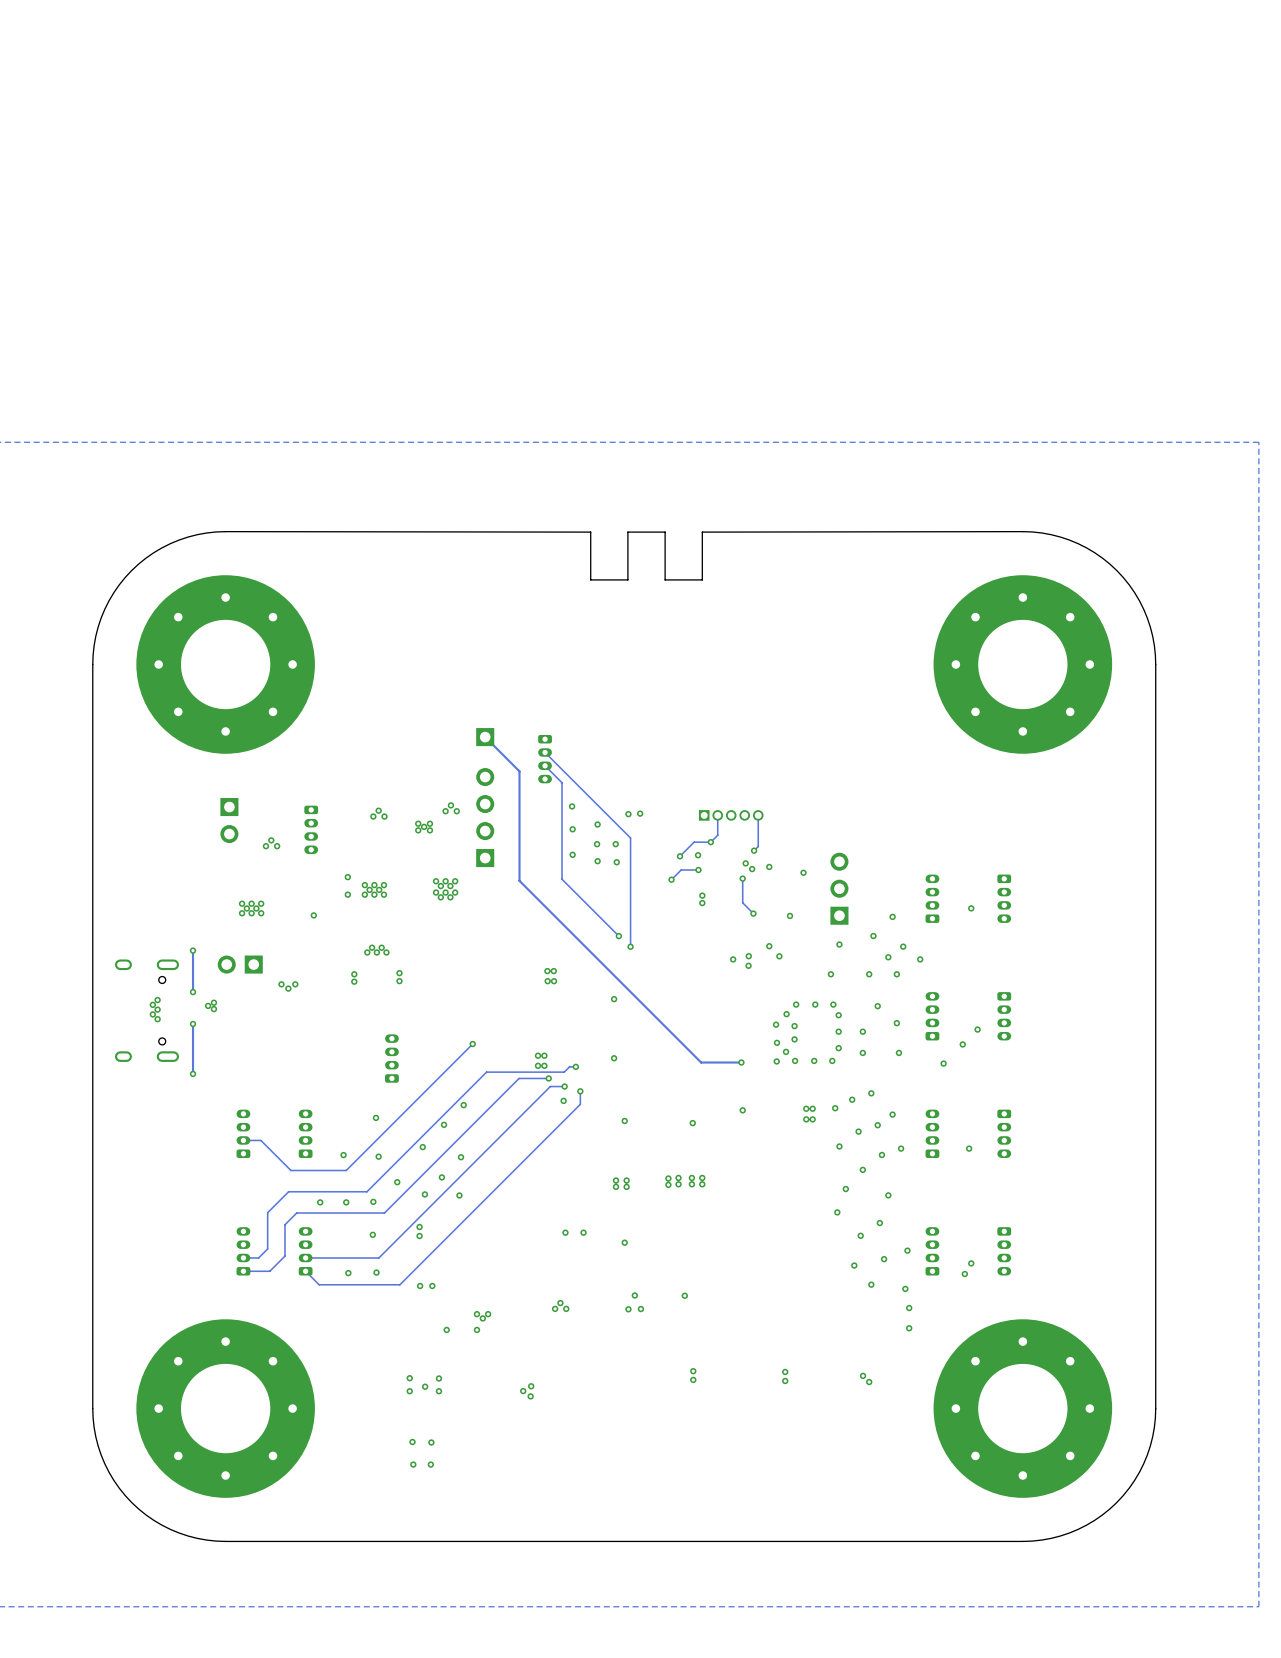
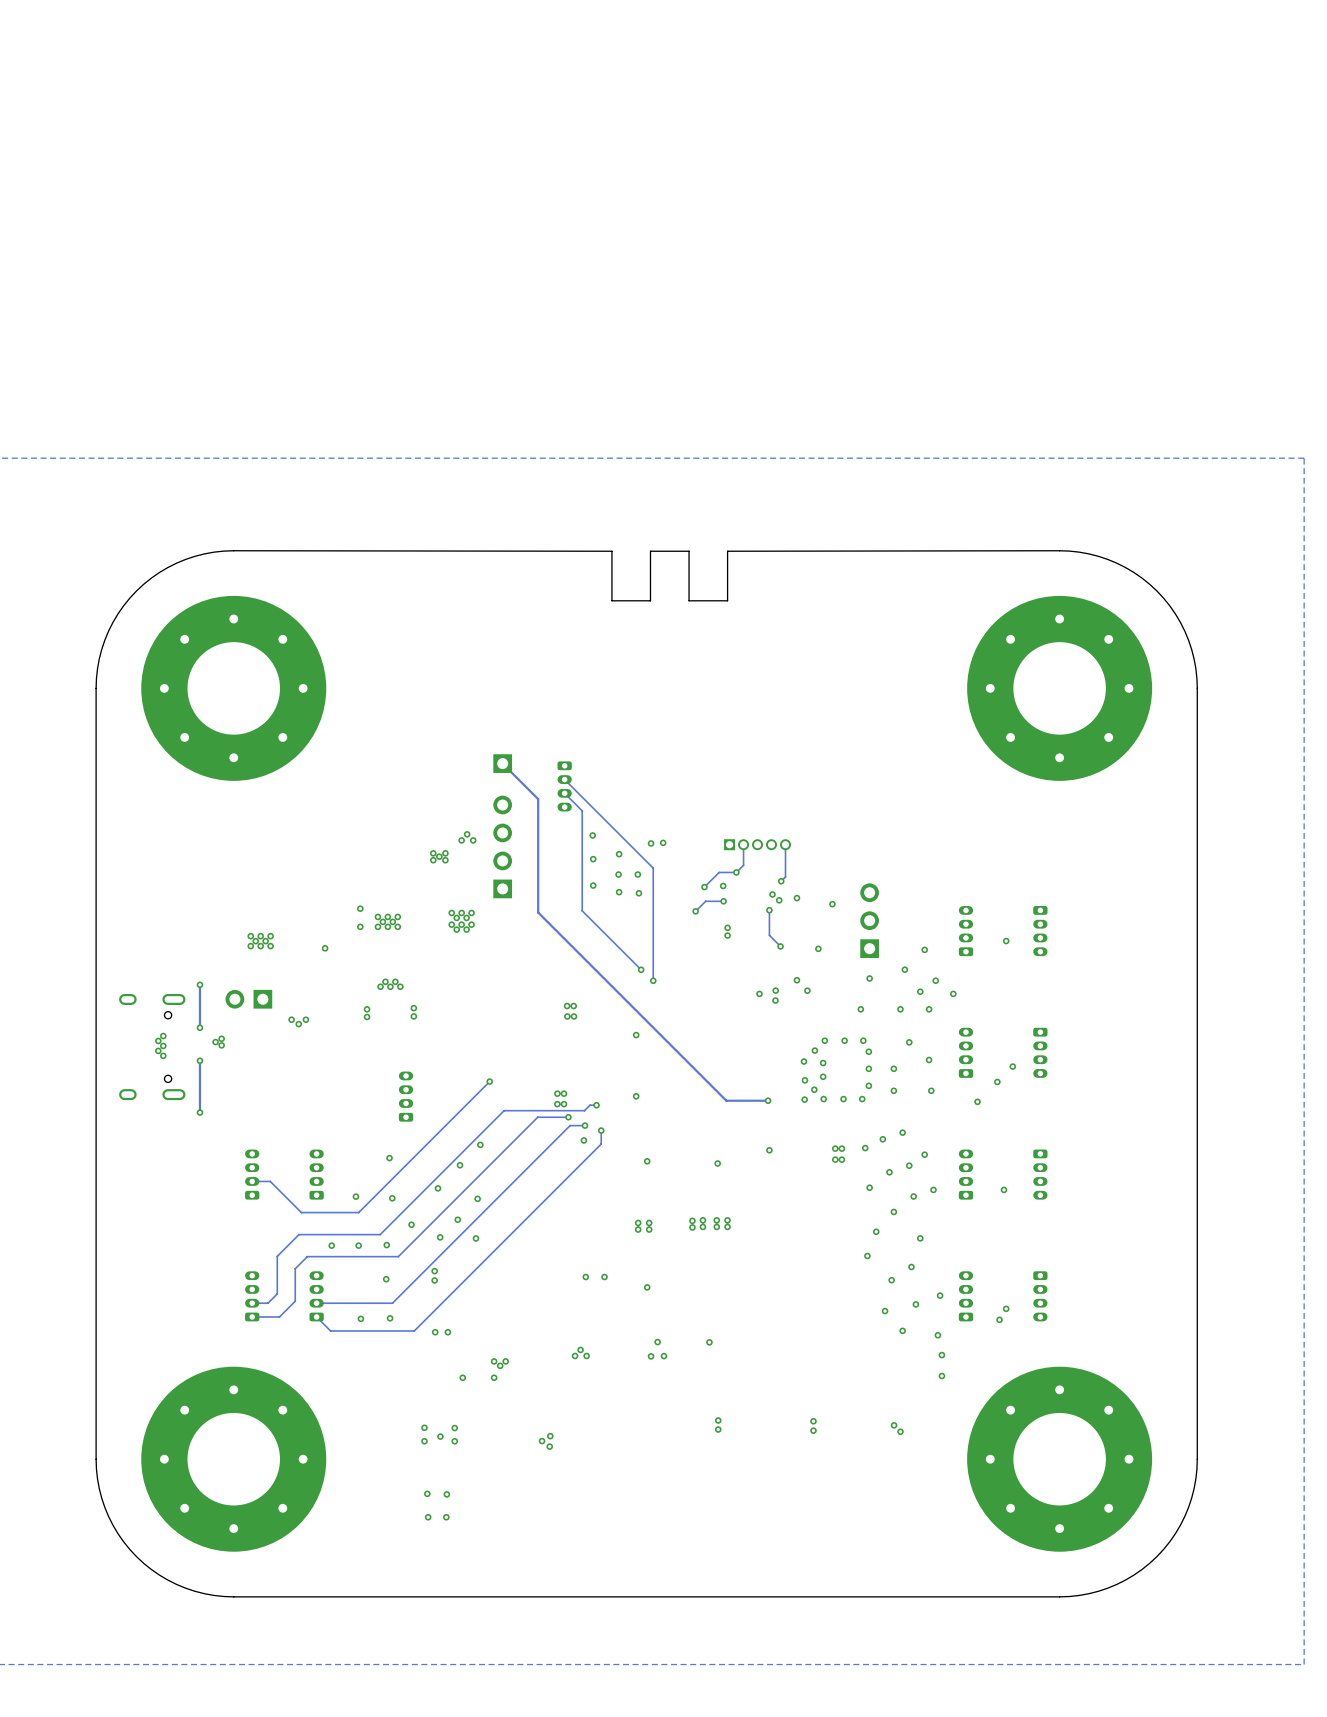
via: (378, 810) -> none
via: (373, 816) -> none
via: (384, 816) -> none
part: (229, 820) -> none
part: (311, 829) -> none
via: (271, 840) -> none
via: (265, 846) -> none
via: (277, 846) -> none

